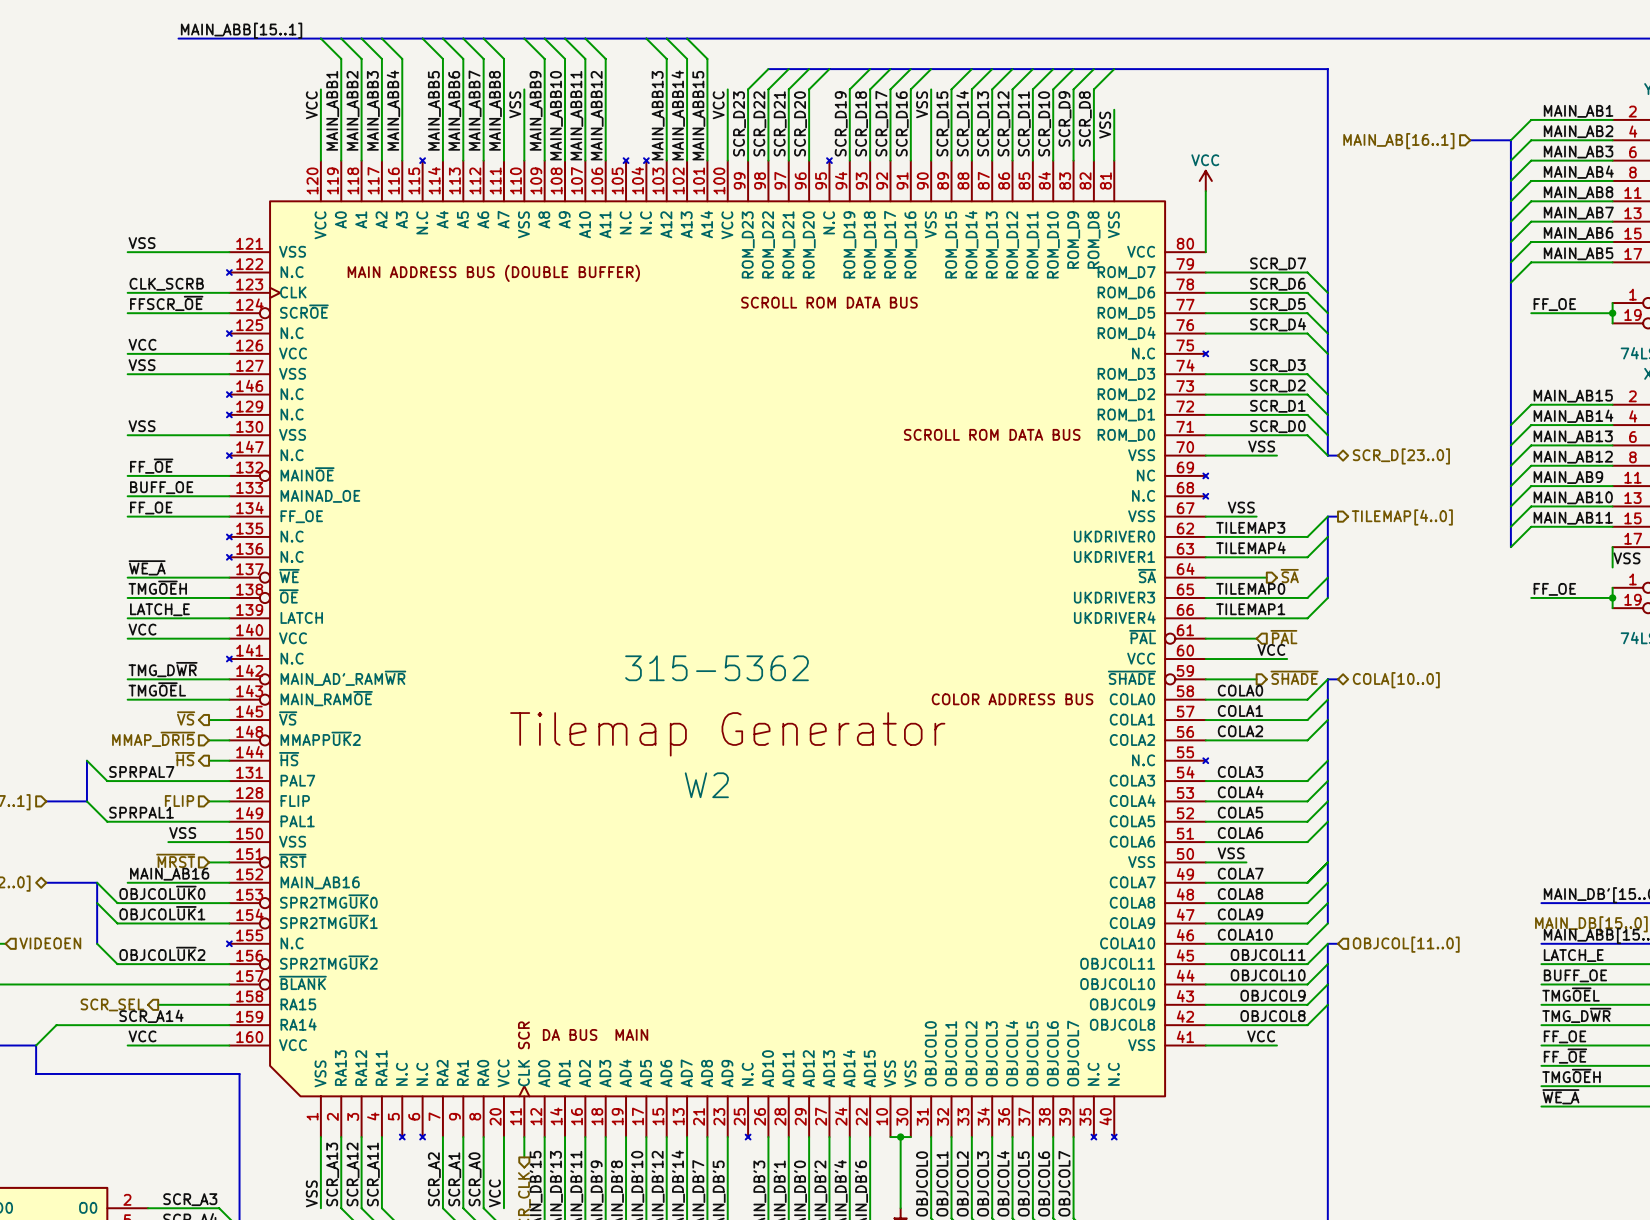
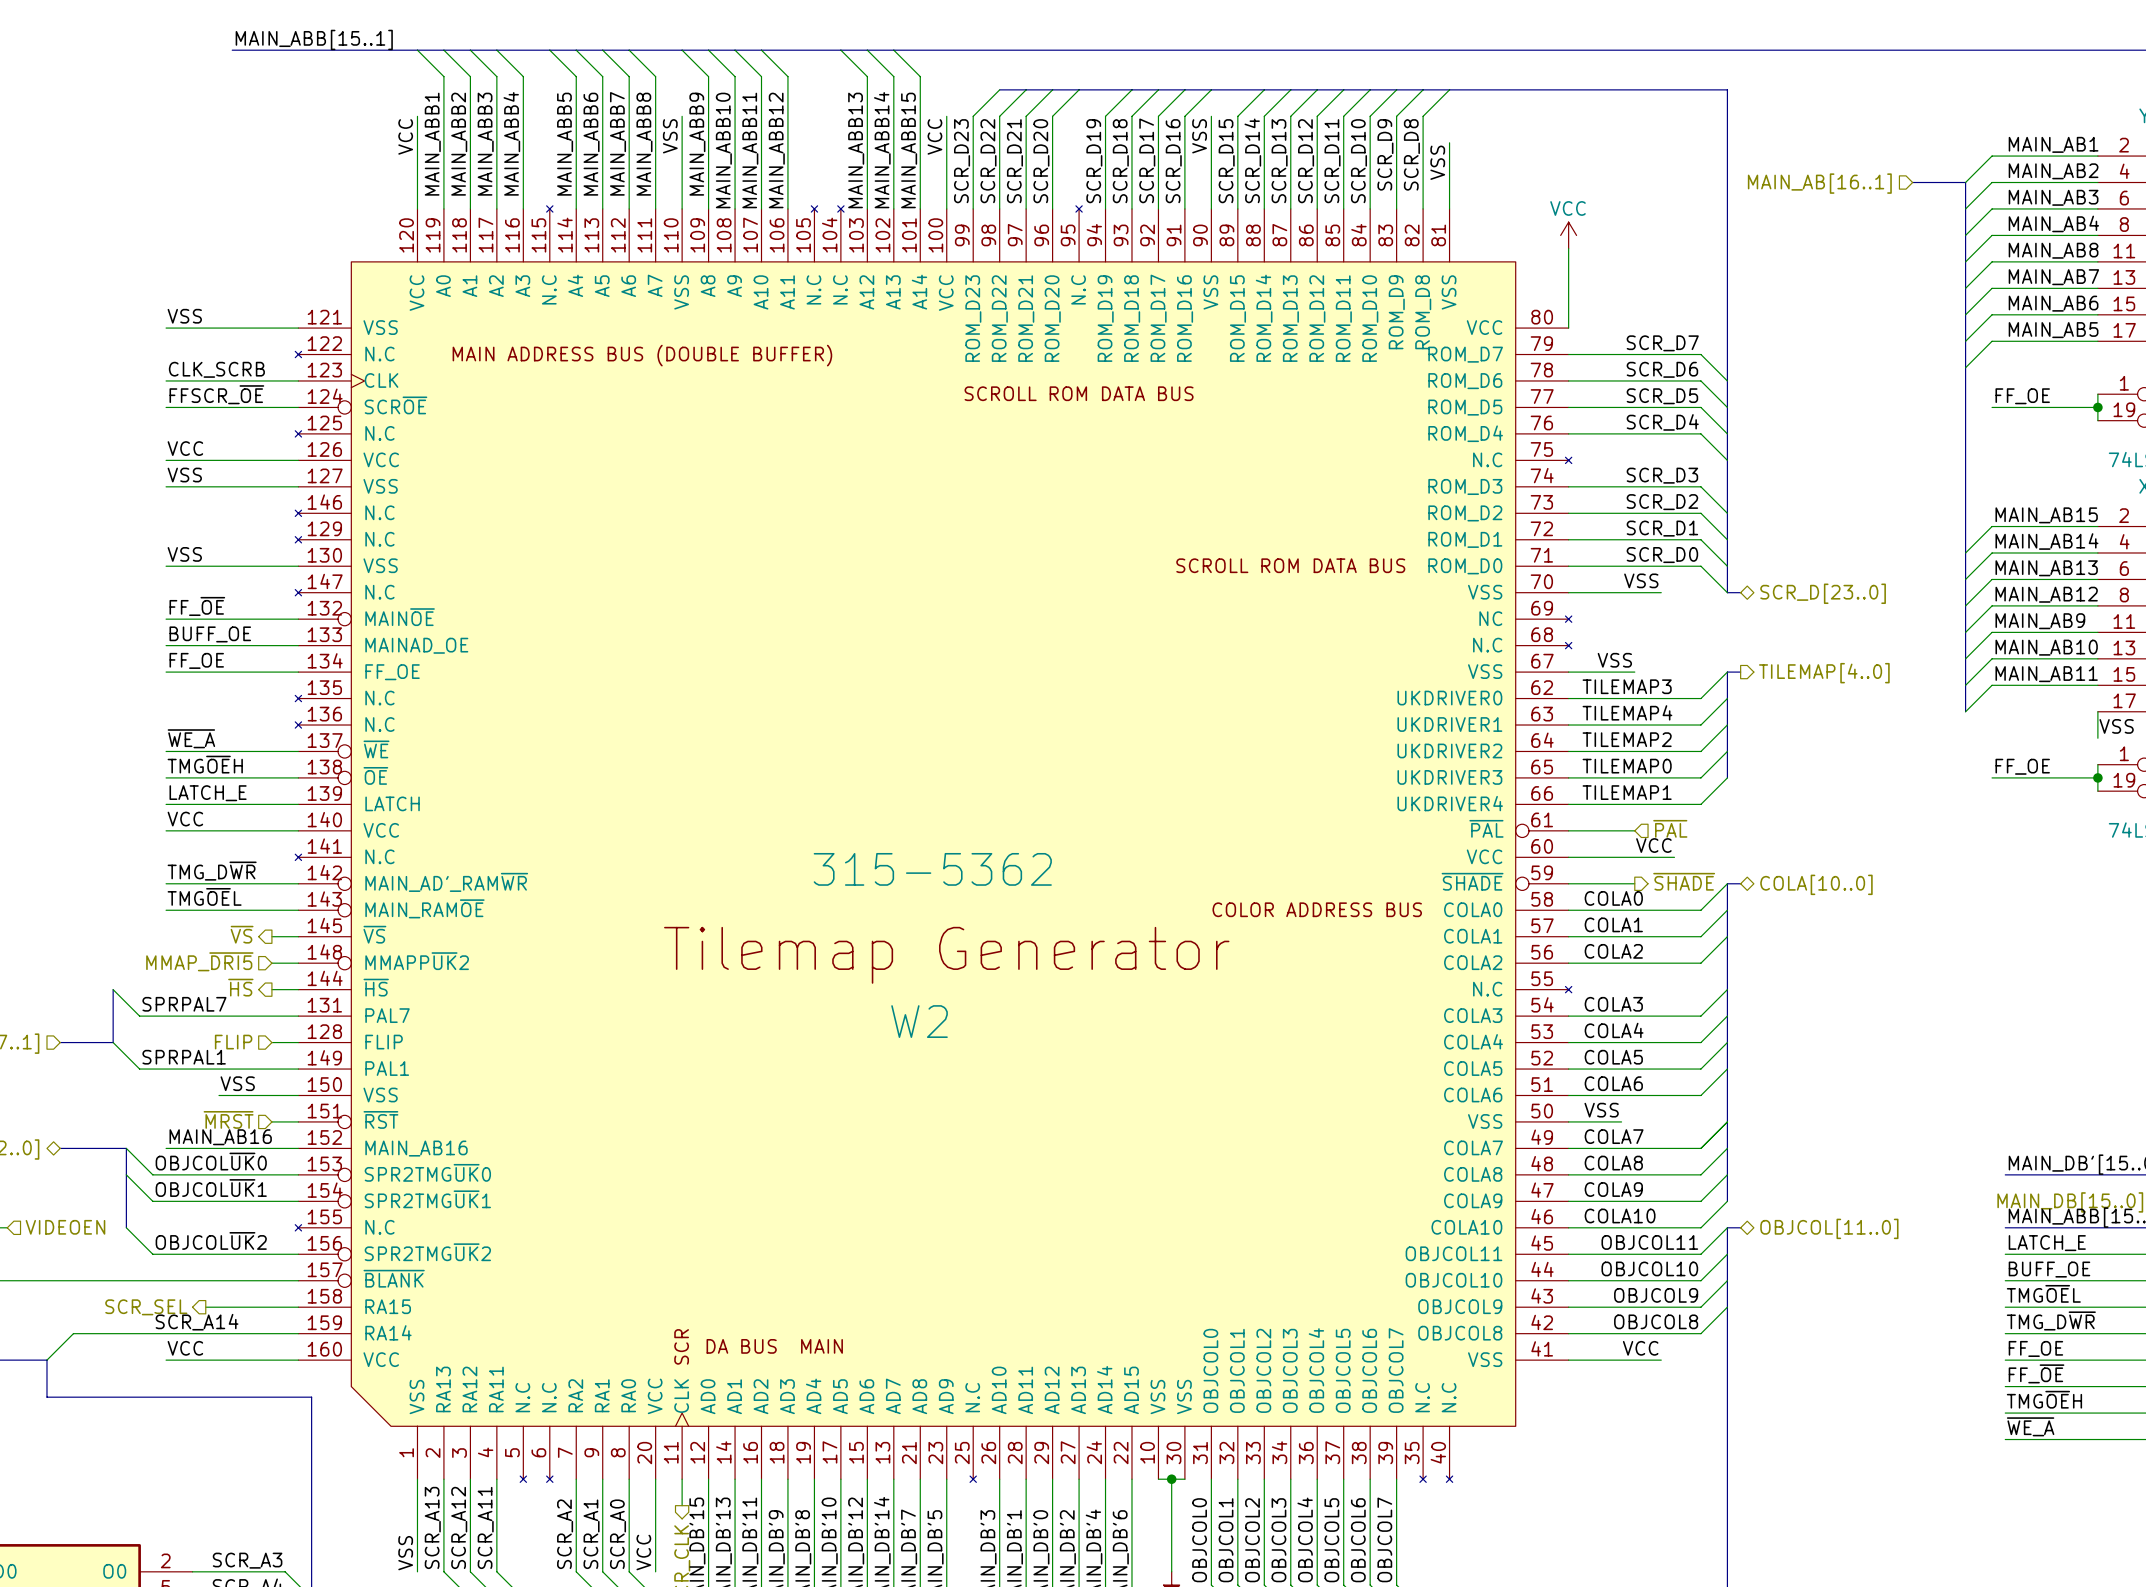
wire: none -> (1727, 725) (1700, 751) (1648, 751)
label: none -> TILEMAP2 (1627, 739)
W2 pin name: ~{SA} (1146, 576) -> UKDRIVER2 (1449, 750)
hierarchical label: ~{SA} (1289, 576) -> none
hierarchical label shape: input (1406, 944) -> bidirectional (1829, 1228)

